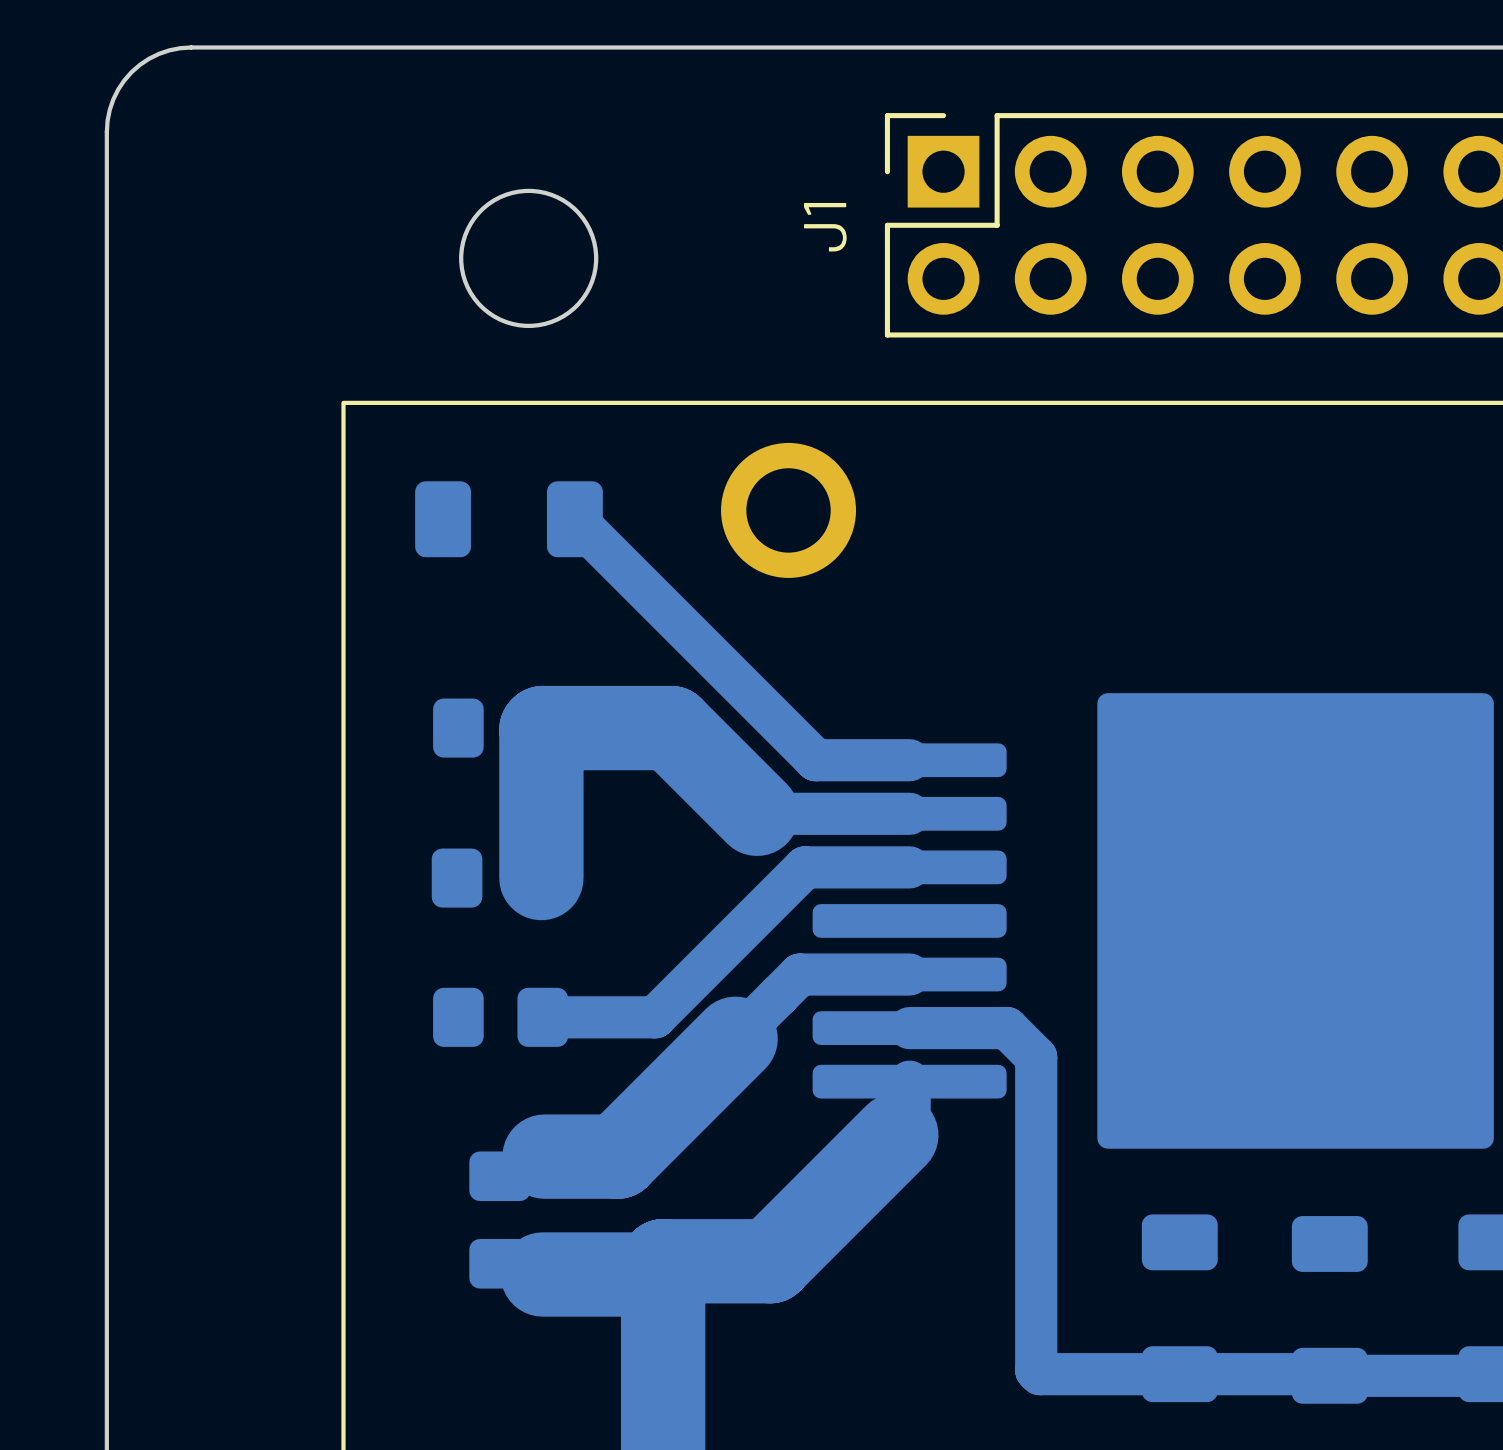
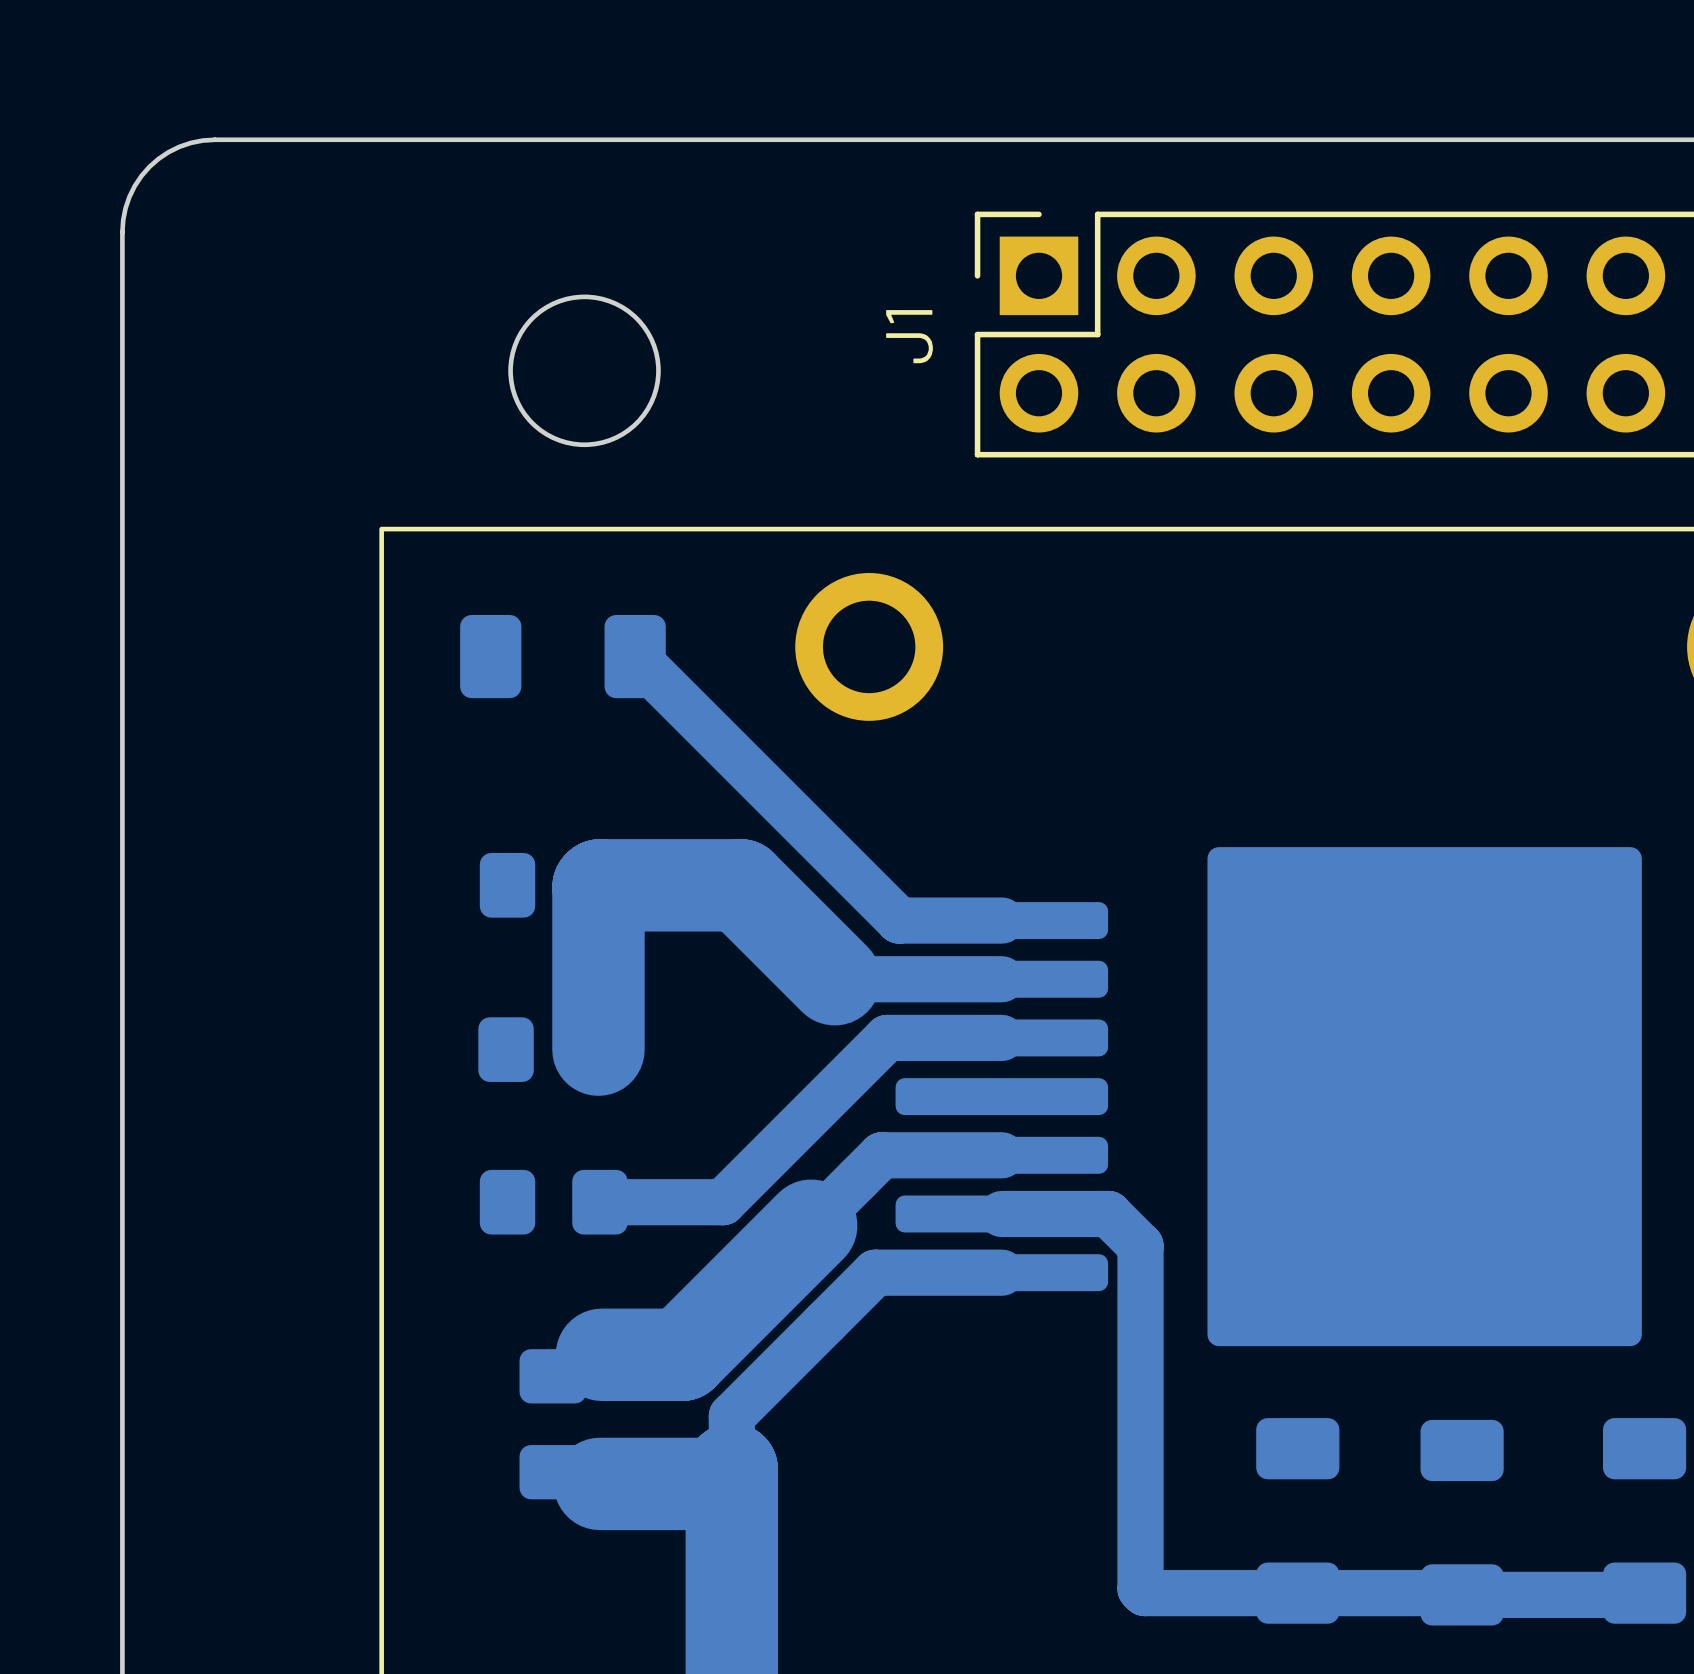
bottom track: (909, 1081) (909, 1121) (770, 1261) (663, 1261) -> (1001, 1272) (875, 1272) (731, 1416) (731, 1469)

